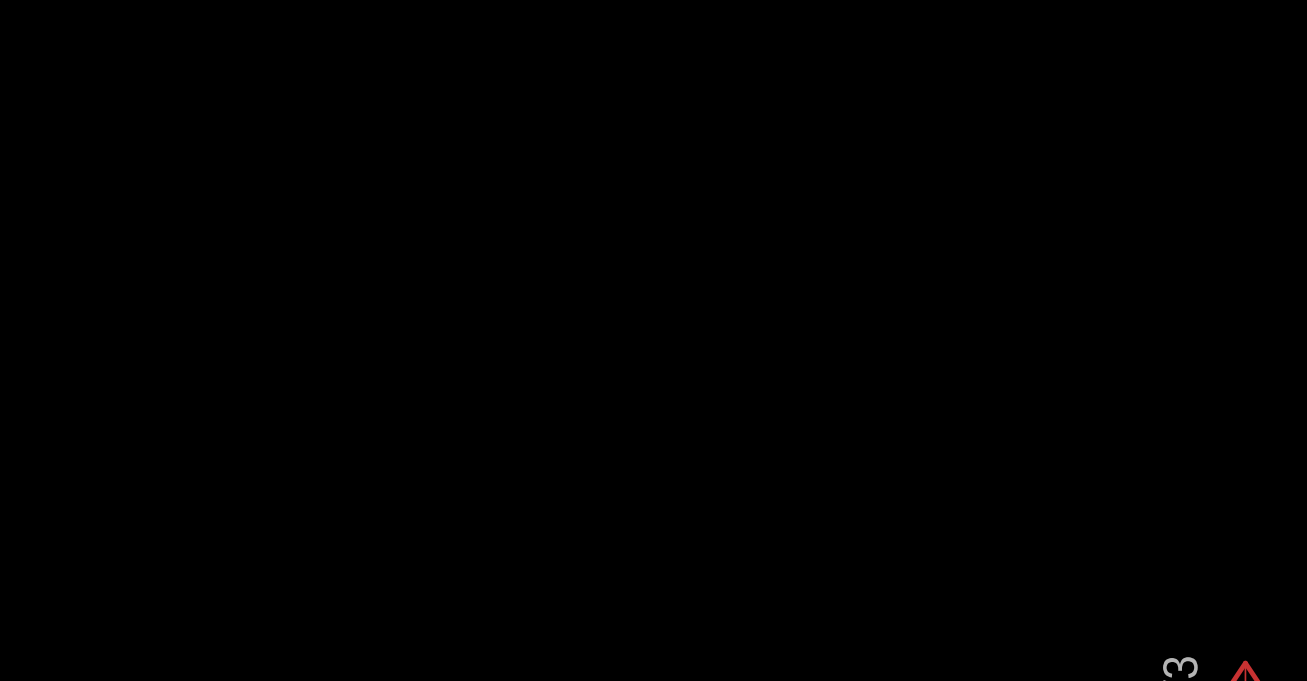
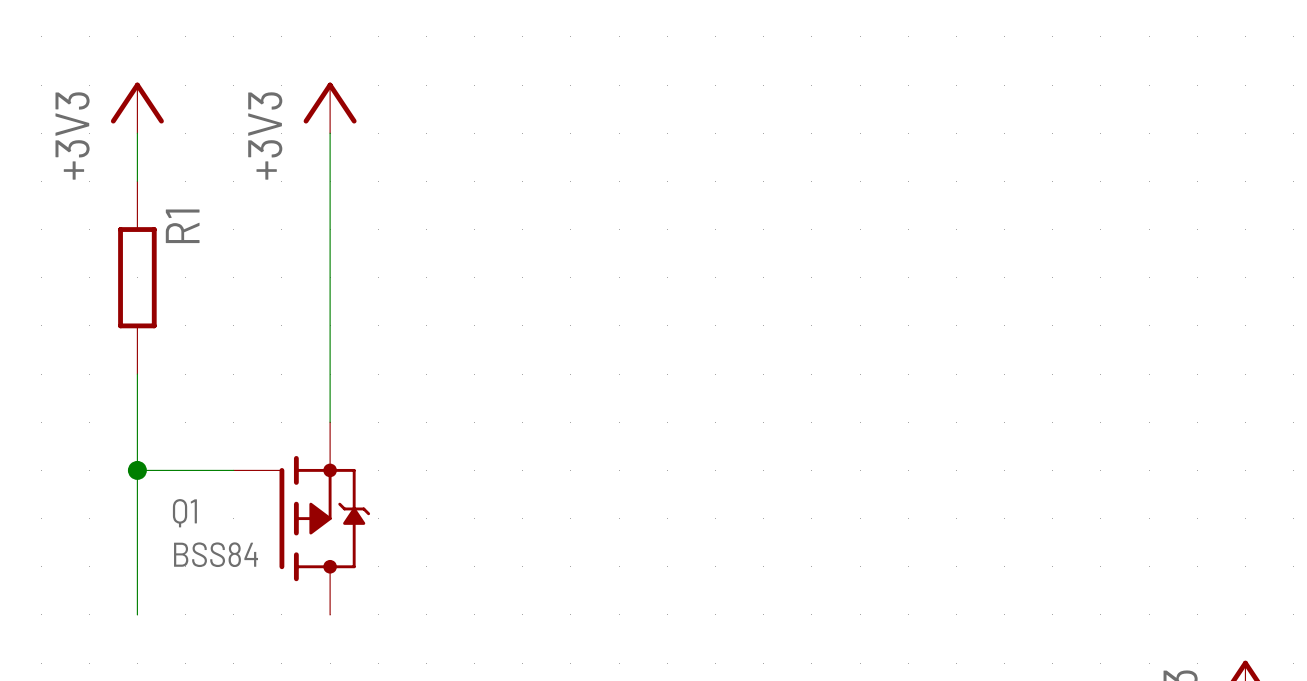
power symbol: none -> +3V3 (137, 107)
power symbol: none -> +3V3 (330, 107)
wire: none -> (137, 133) (137, 181)
wire: none -> (330, 133) (330, 422)
R1: none -> (137, 277)
wire: none -> (137, 374) (137, 614)
wire: none -> (137, 470) (233, 470)
junction: none -> (137, 470)
Q1: none -> BSS84 (301, 518)

